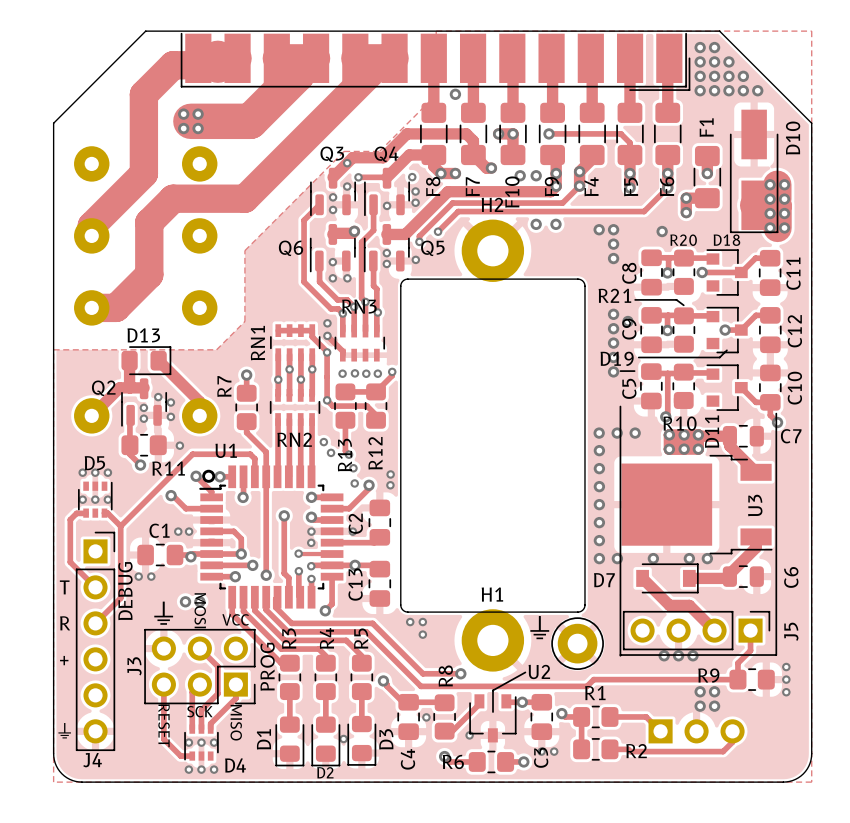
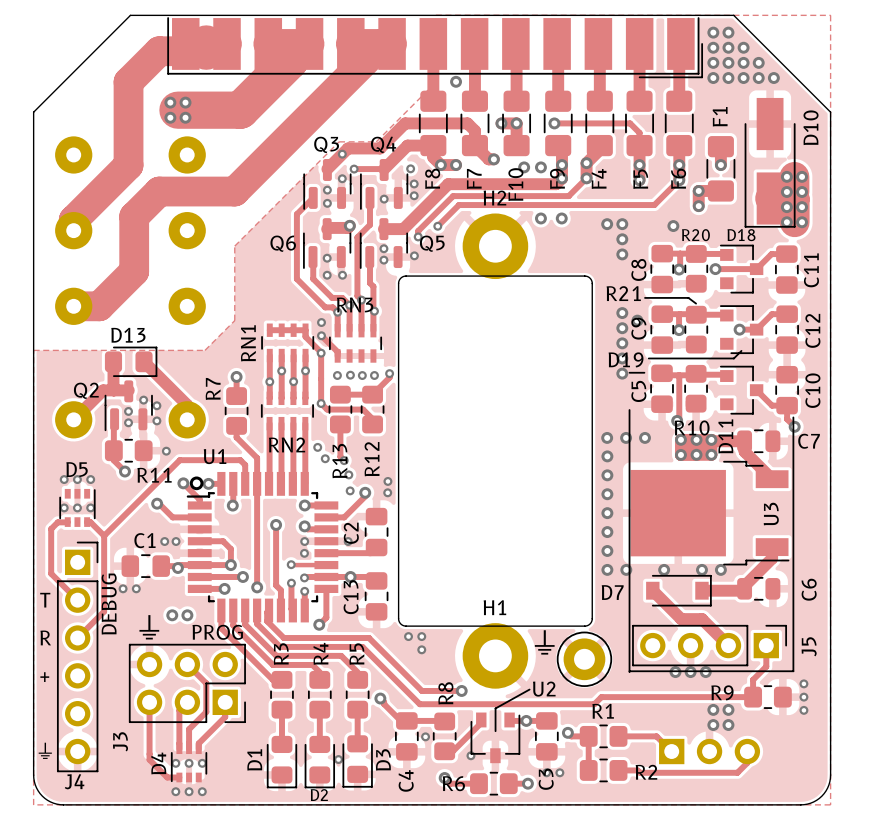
text: MOSI (200, 610) -> none
text: VCC (235, 619) -> PROG (217, 632)
J3 name position: J3 (134, 666) -> J3 (120, 741)
text: PROG (267, 666) -> none
text: SCK (199, 711) -> none
text: MISO (236, 722) -> none
text: RESET (164, 725) -> none
D4 name rotation: 0° (235, 765) -> 90° counterclockwise (158, 763)
D4 name position: D4 (235, 765) -> D4 (158, 763)

